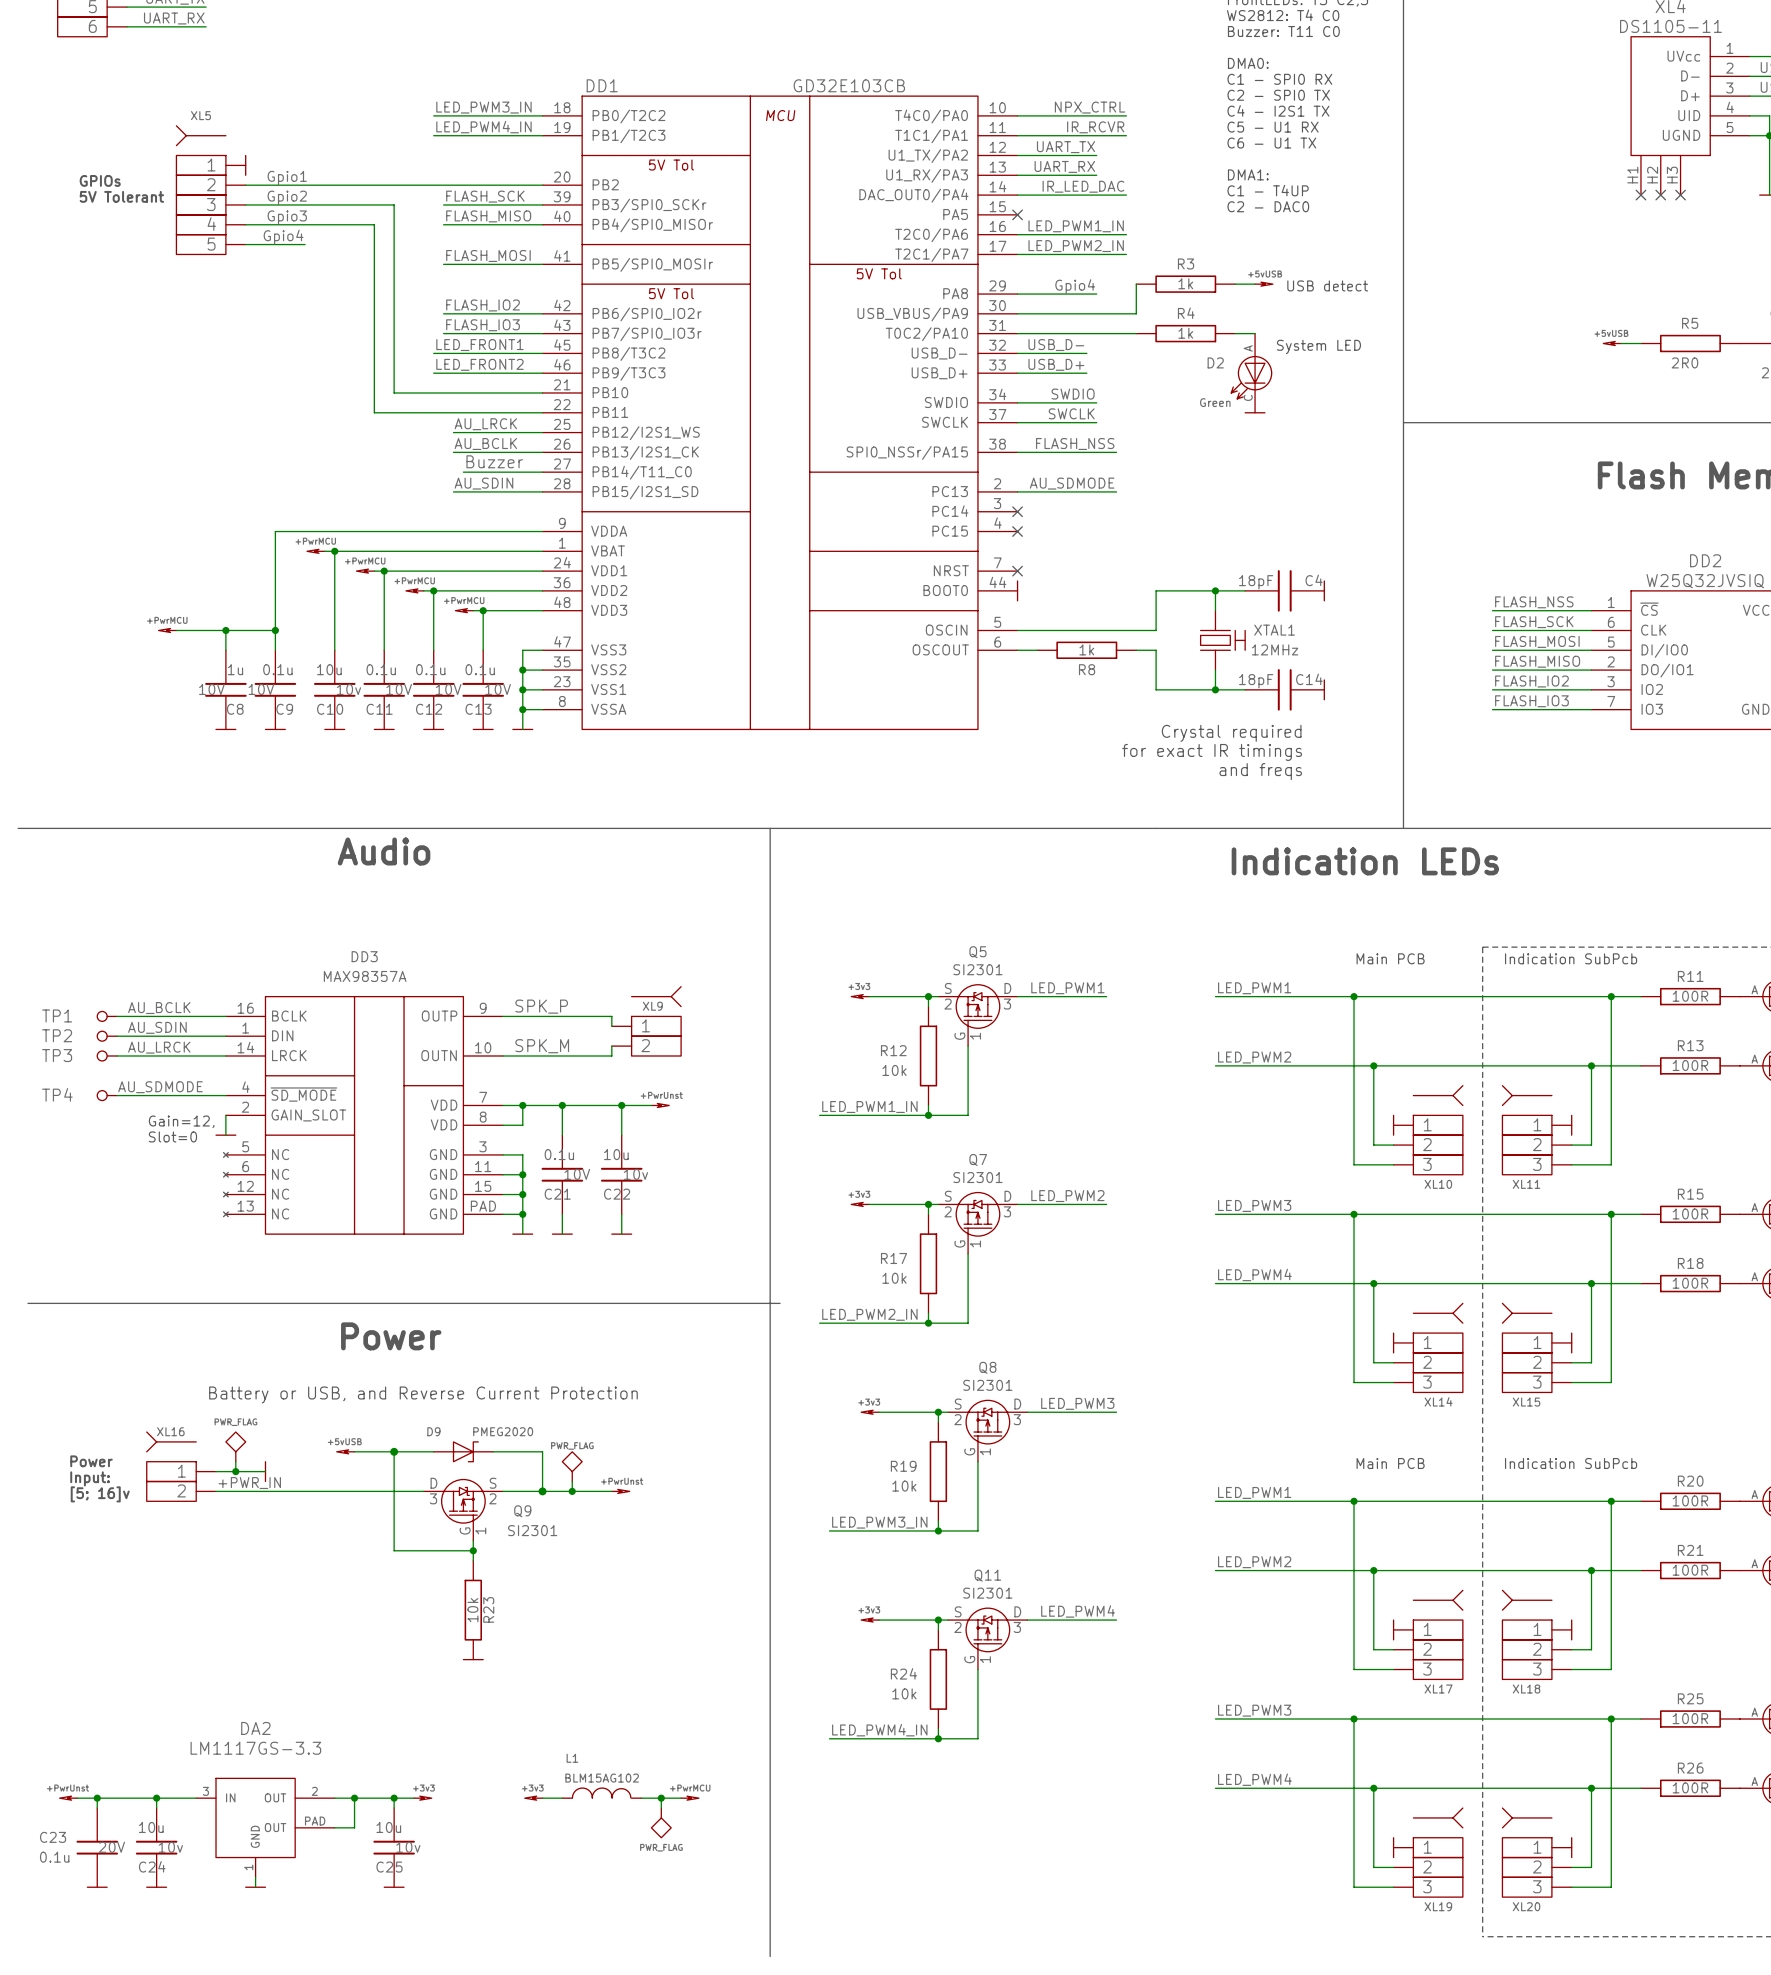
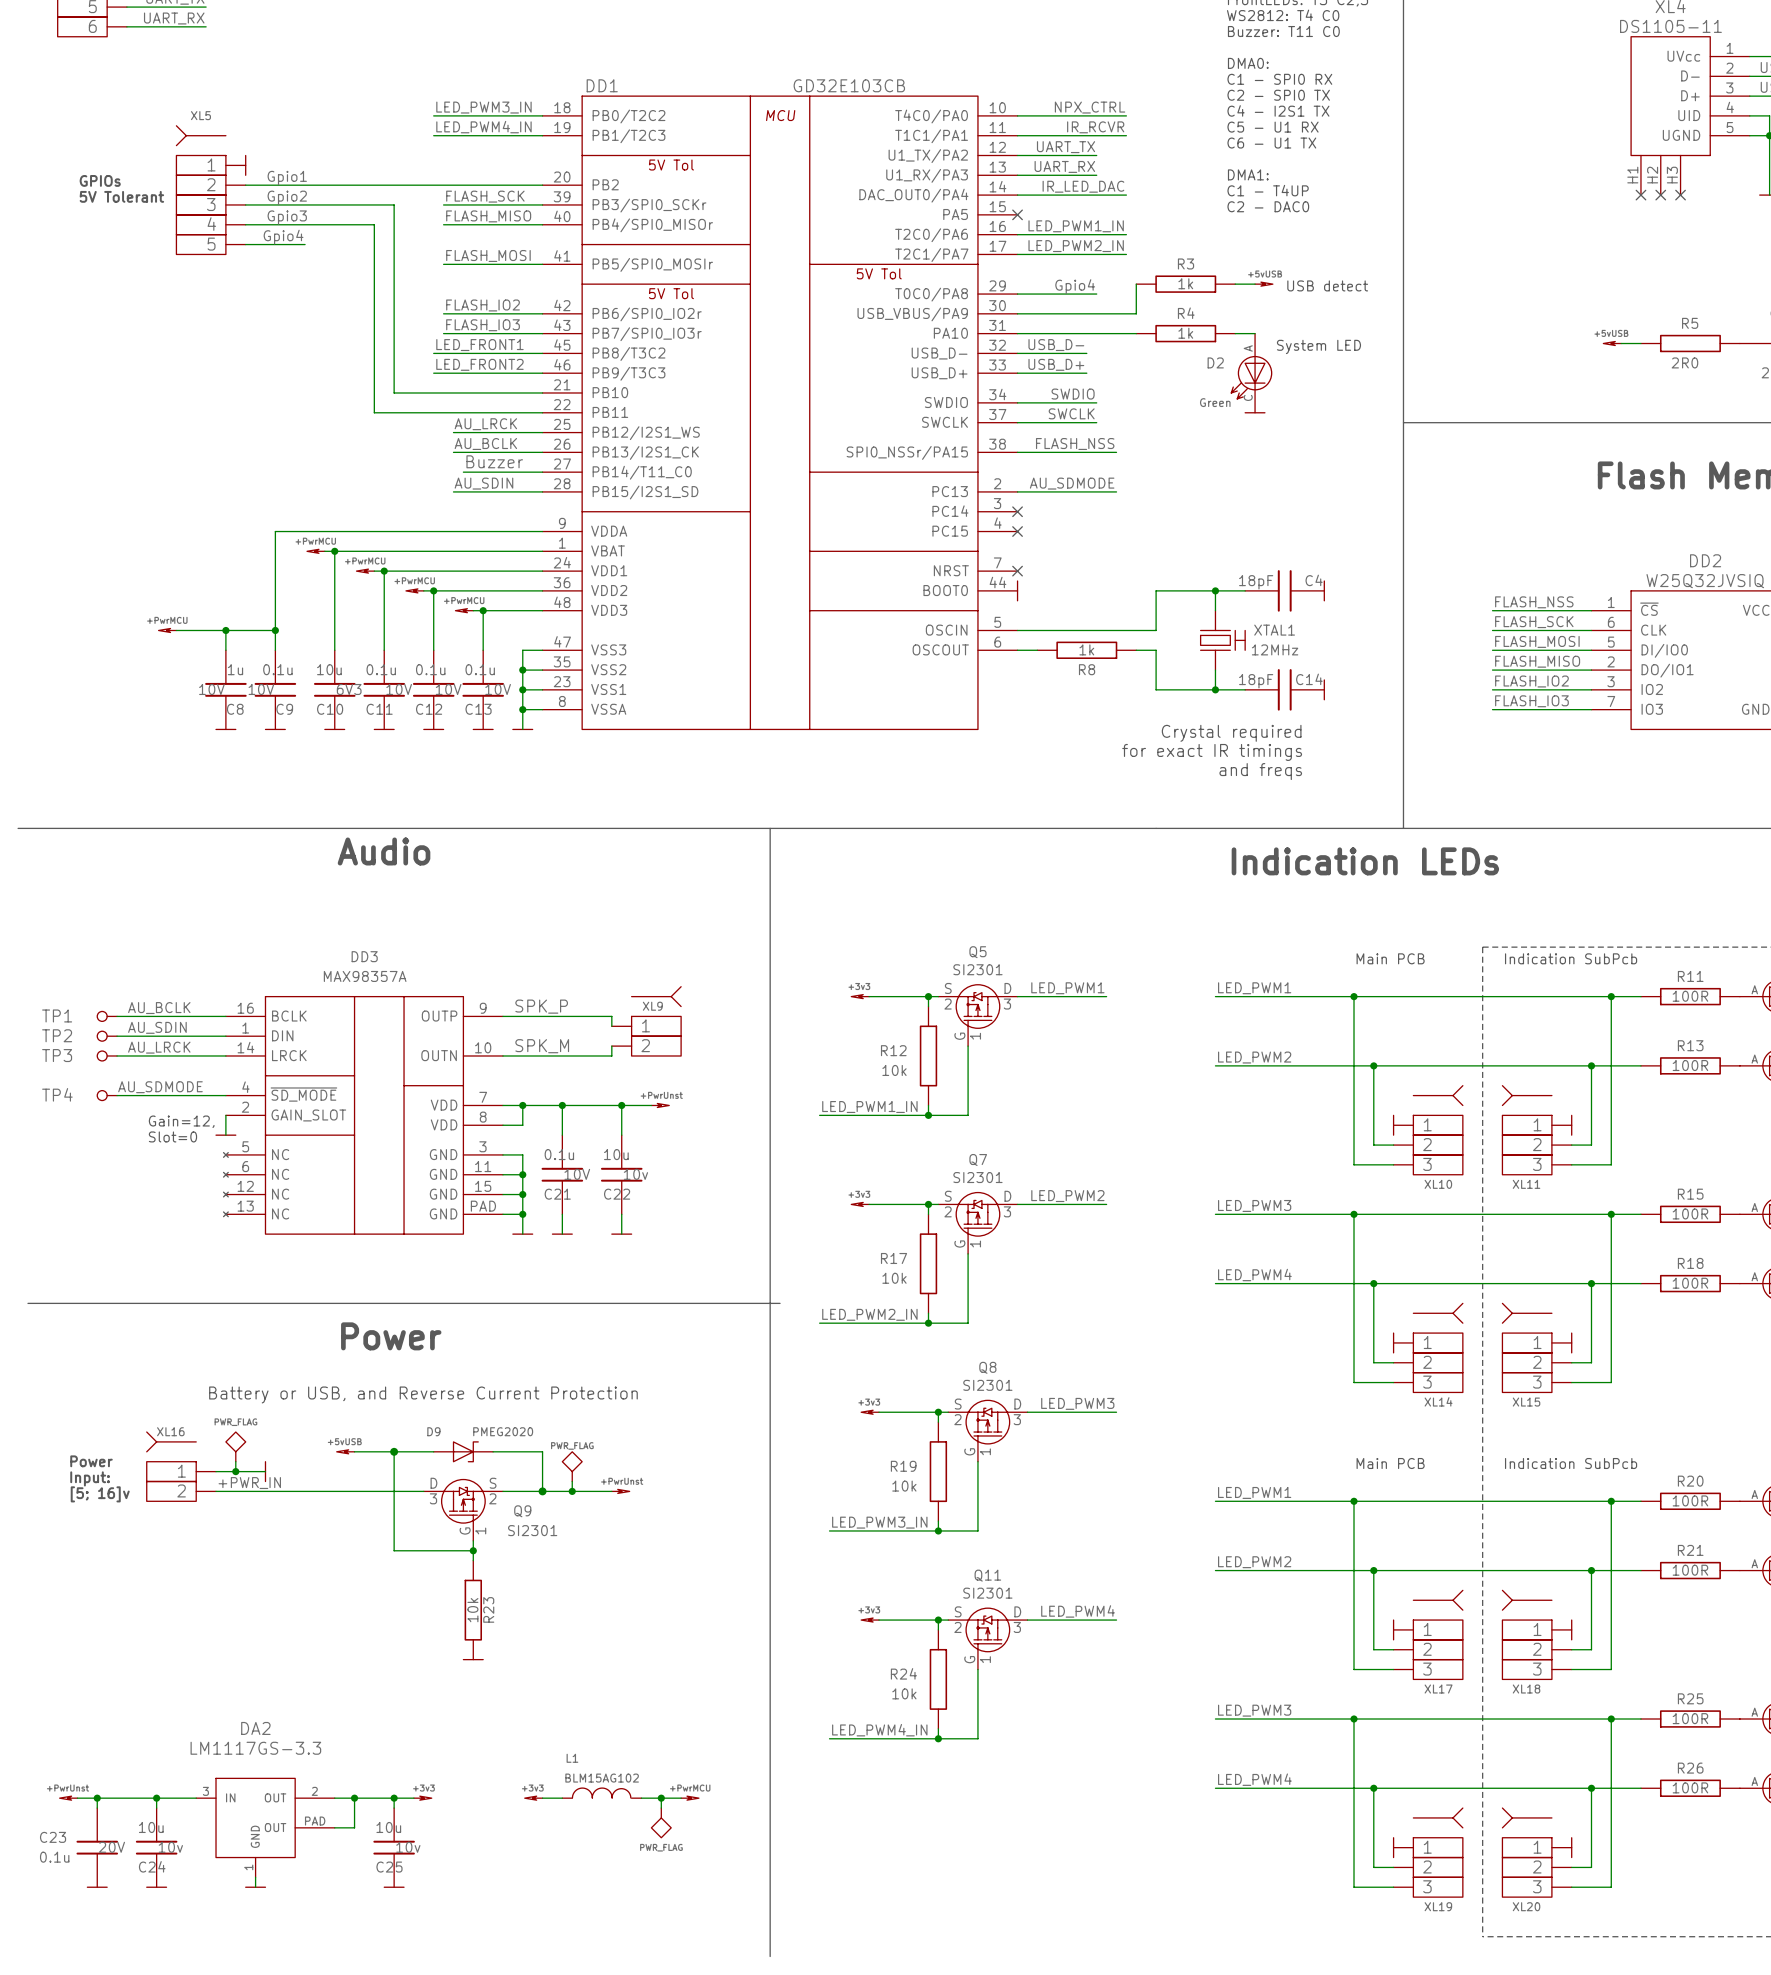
DD1 pin name: PA8 (955, 293) -> T0C0/PA8 (931, 294)
DD1 pin name: T0C2/PA10 (926, 334) -> PA10 (950, 333)
C10 text: 10v (348, 689) -> 6V3 (349, 689)

